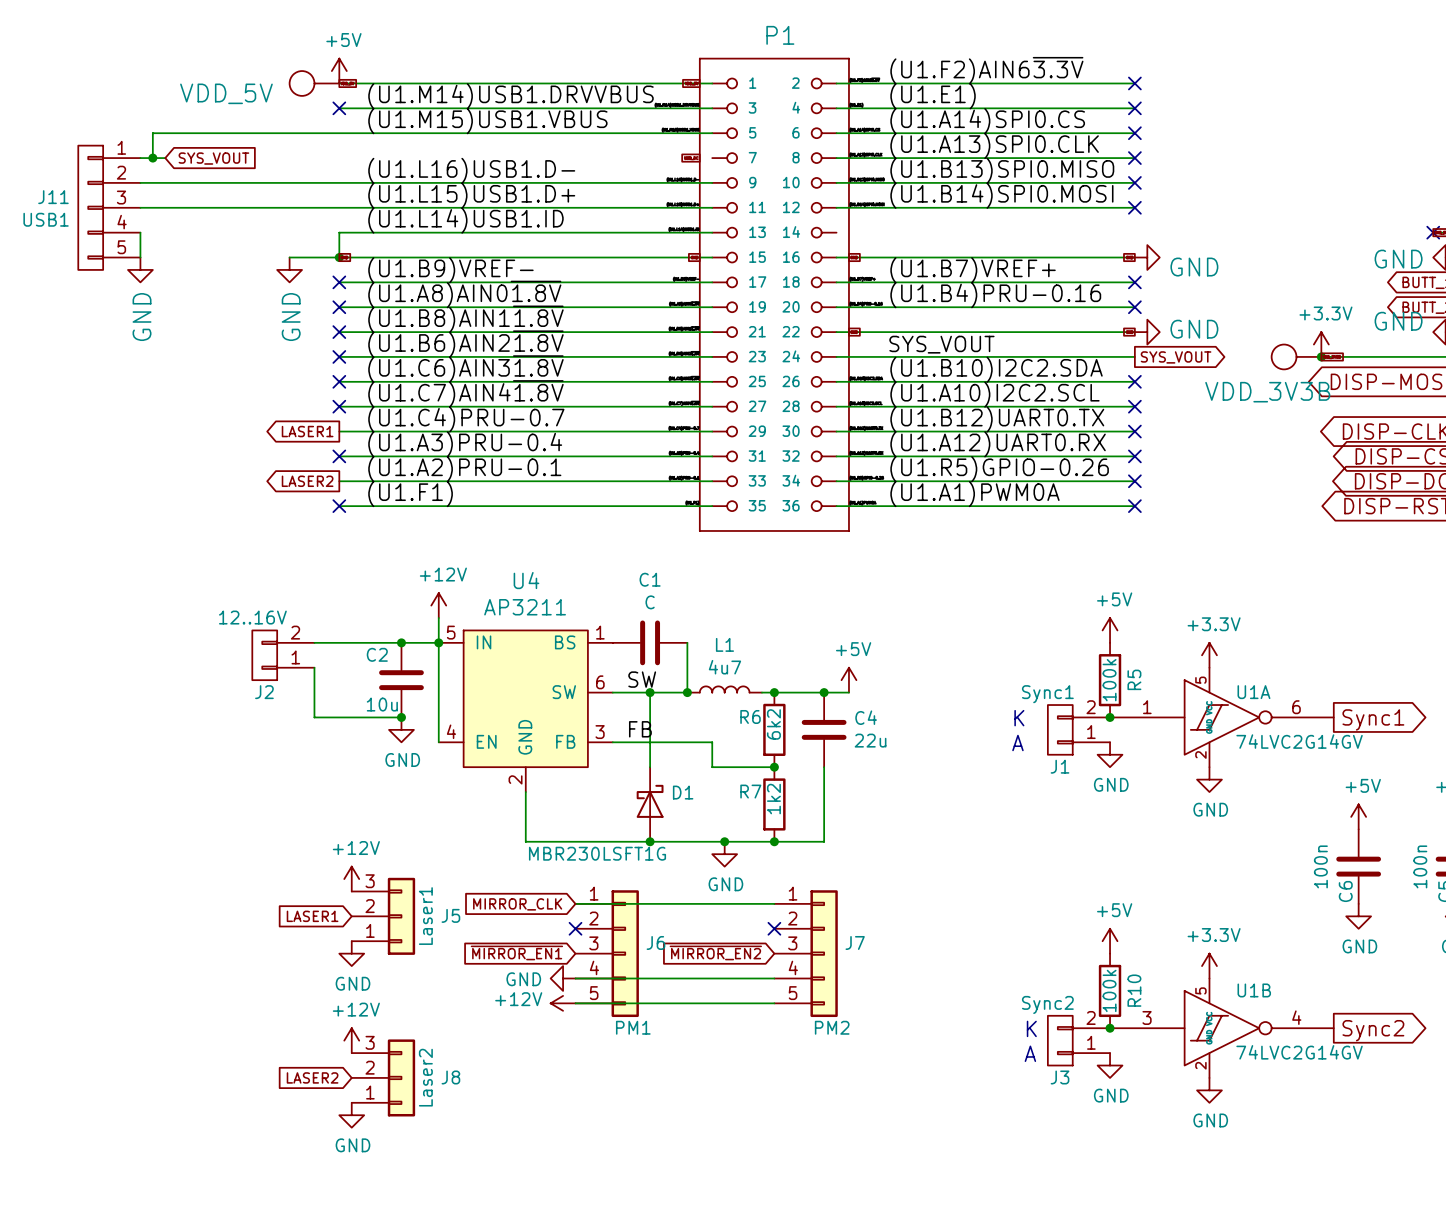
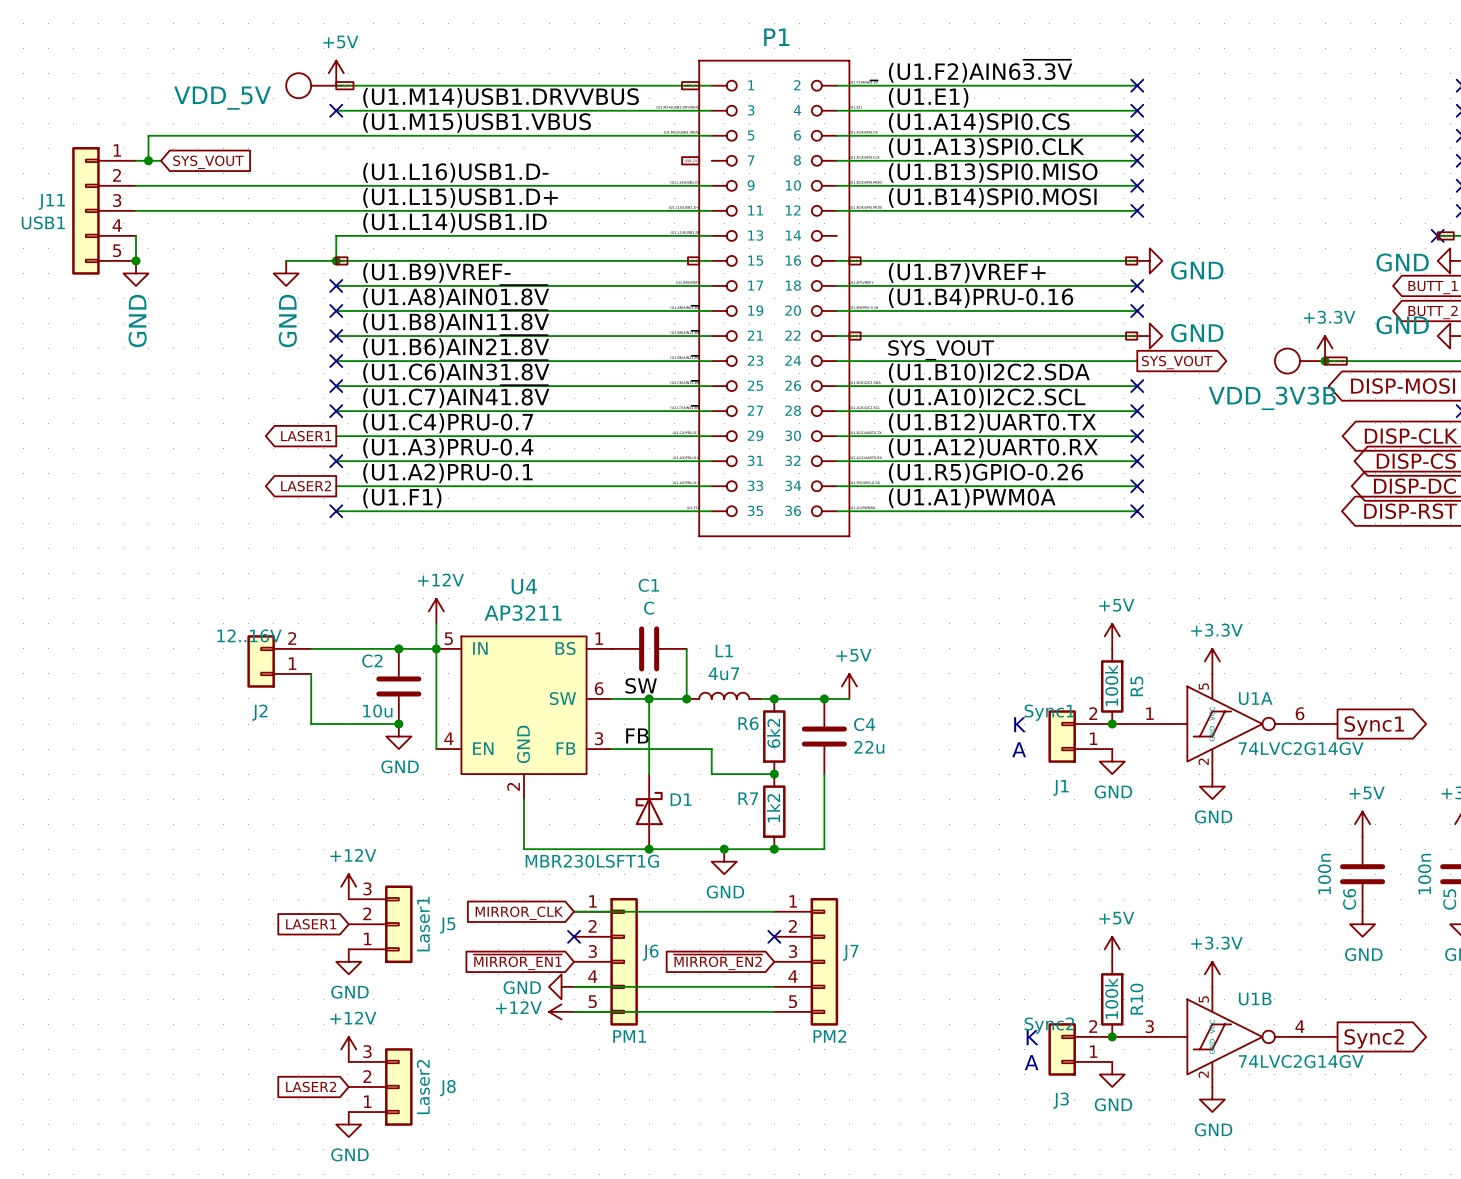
J11 symbol: [78, 145, 141, 270] -> [72, 147, 136, 275]
junction: none -> (135, 260)
J2 symbol: [252, 630, 315, 681] -> [247, 635, 312, 688]
J1 symbol: [1047, 705, 1111, 755] -> [1048, 710, 1113, 763]
J3 symbol: [1047, 1015, 1111, 1066] -> [1048, 1023, 1113, 1076]

